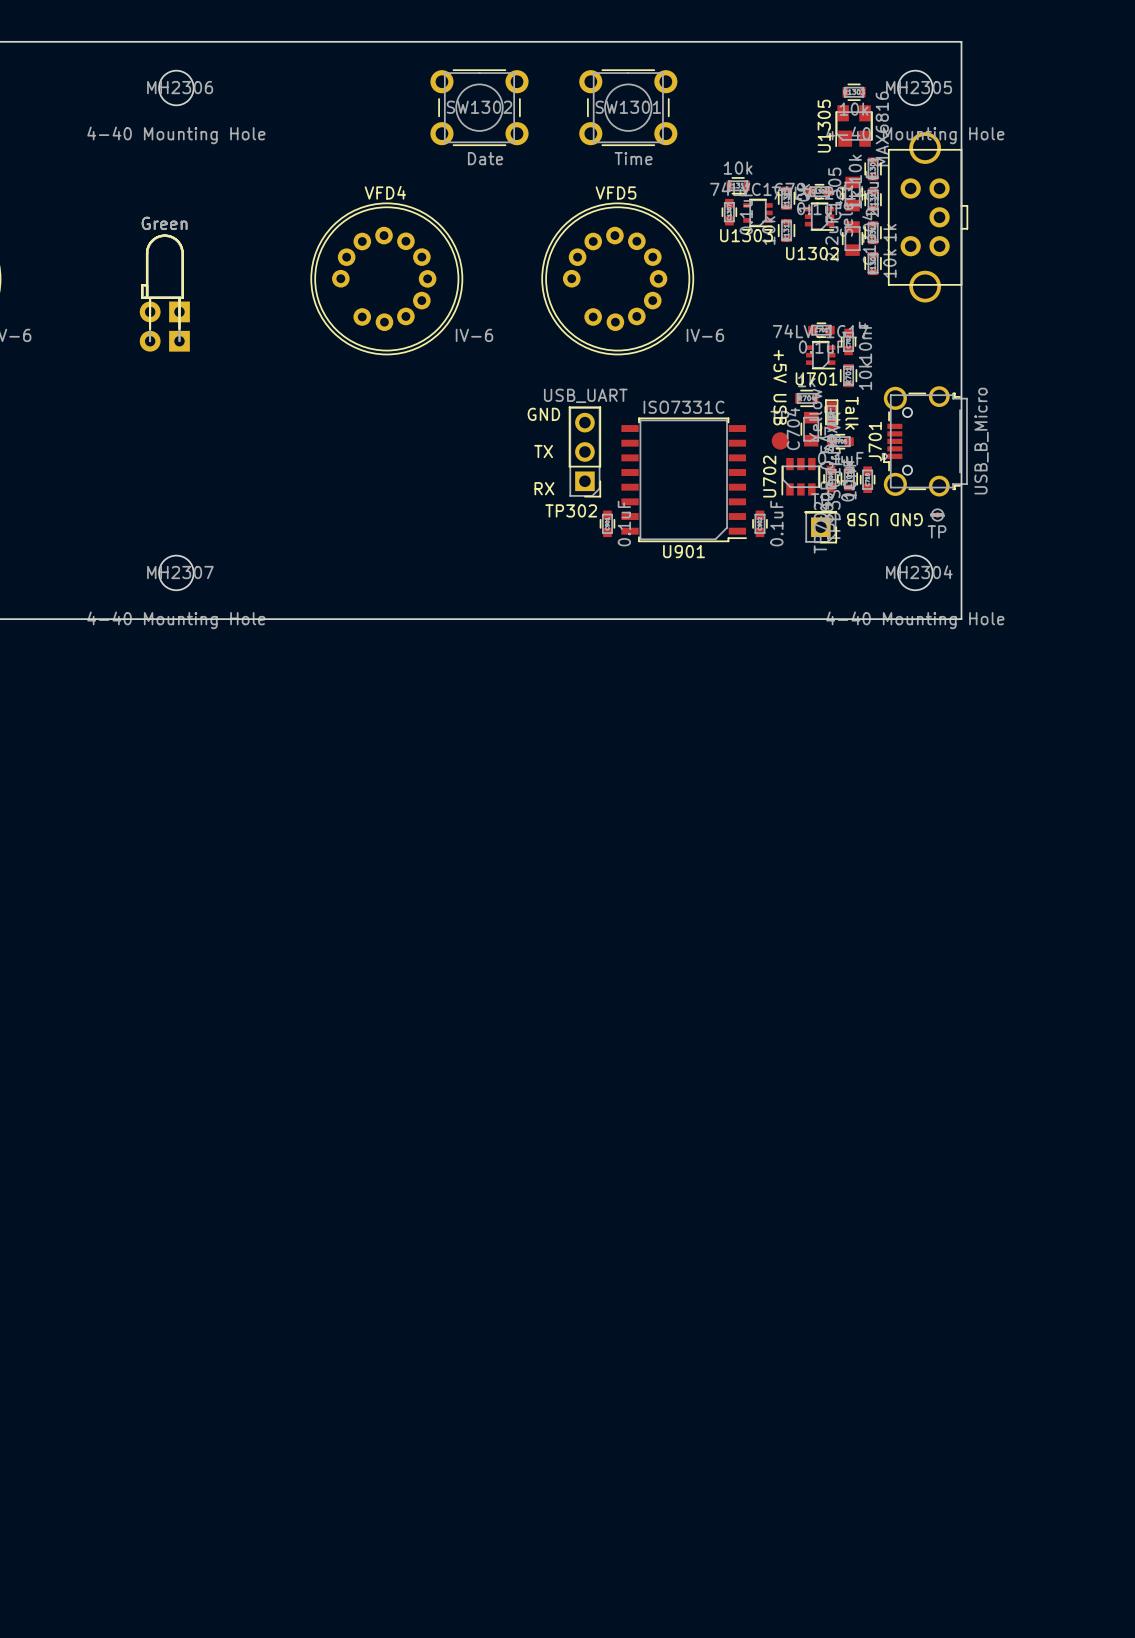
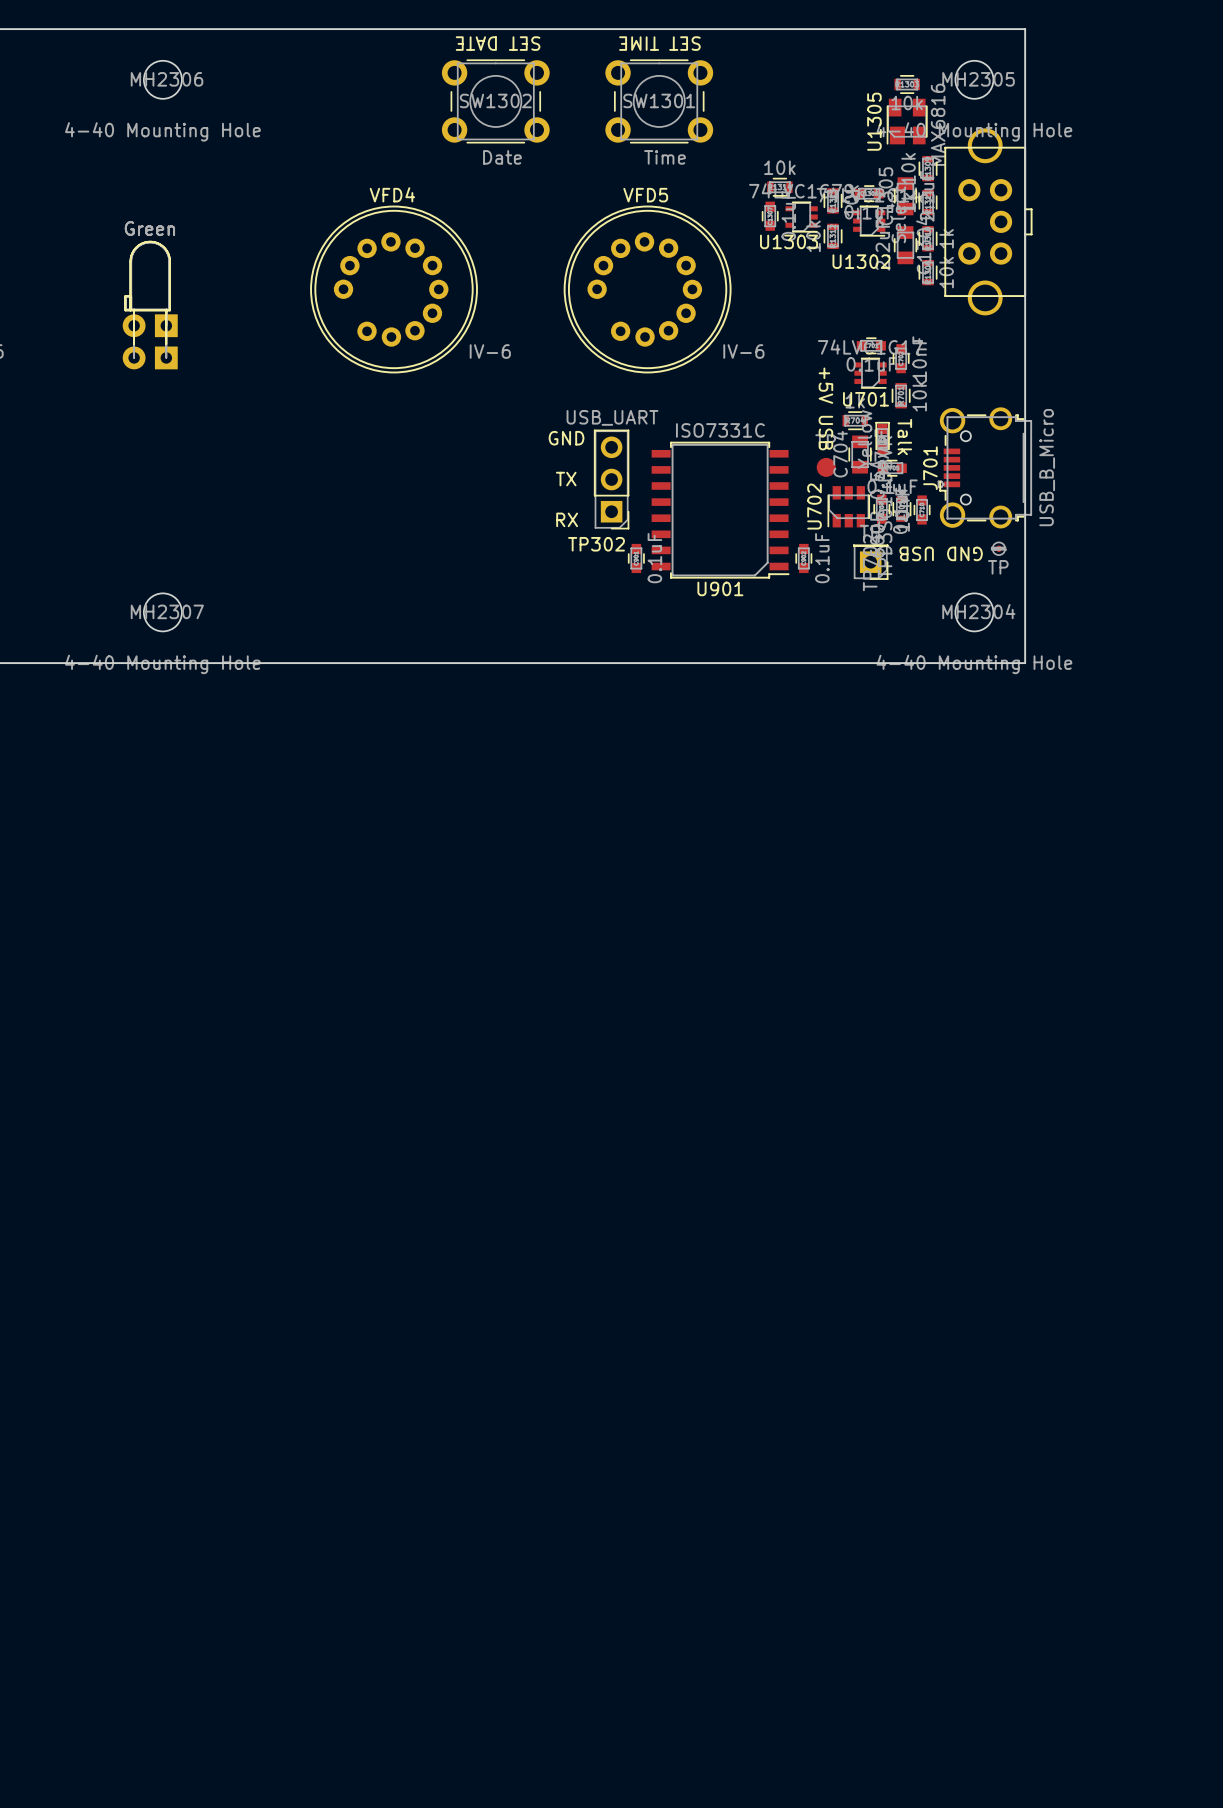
text: none -> SET DATE (498, 43)
text: none -> SET TIME (659, 43)

